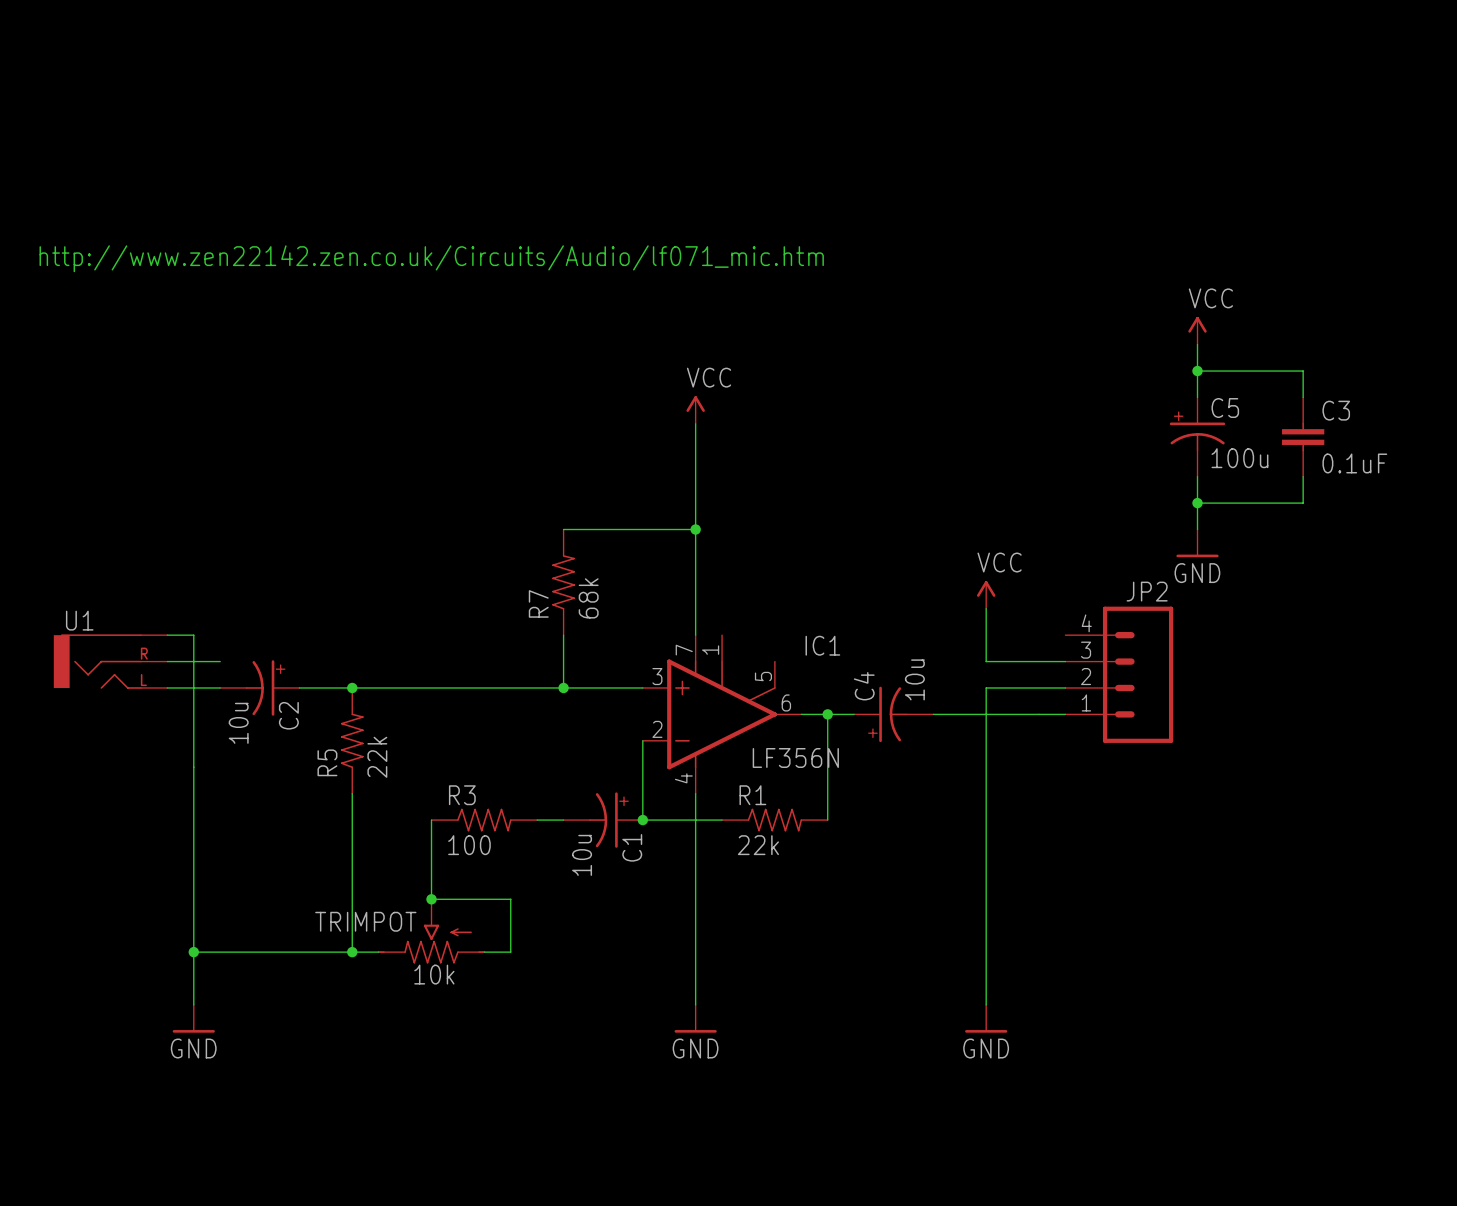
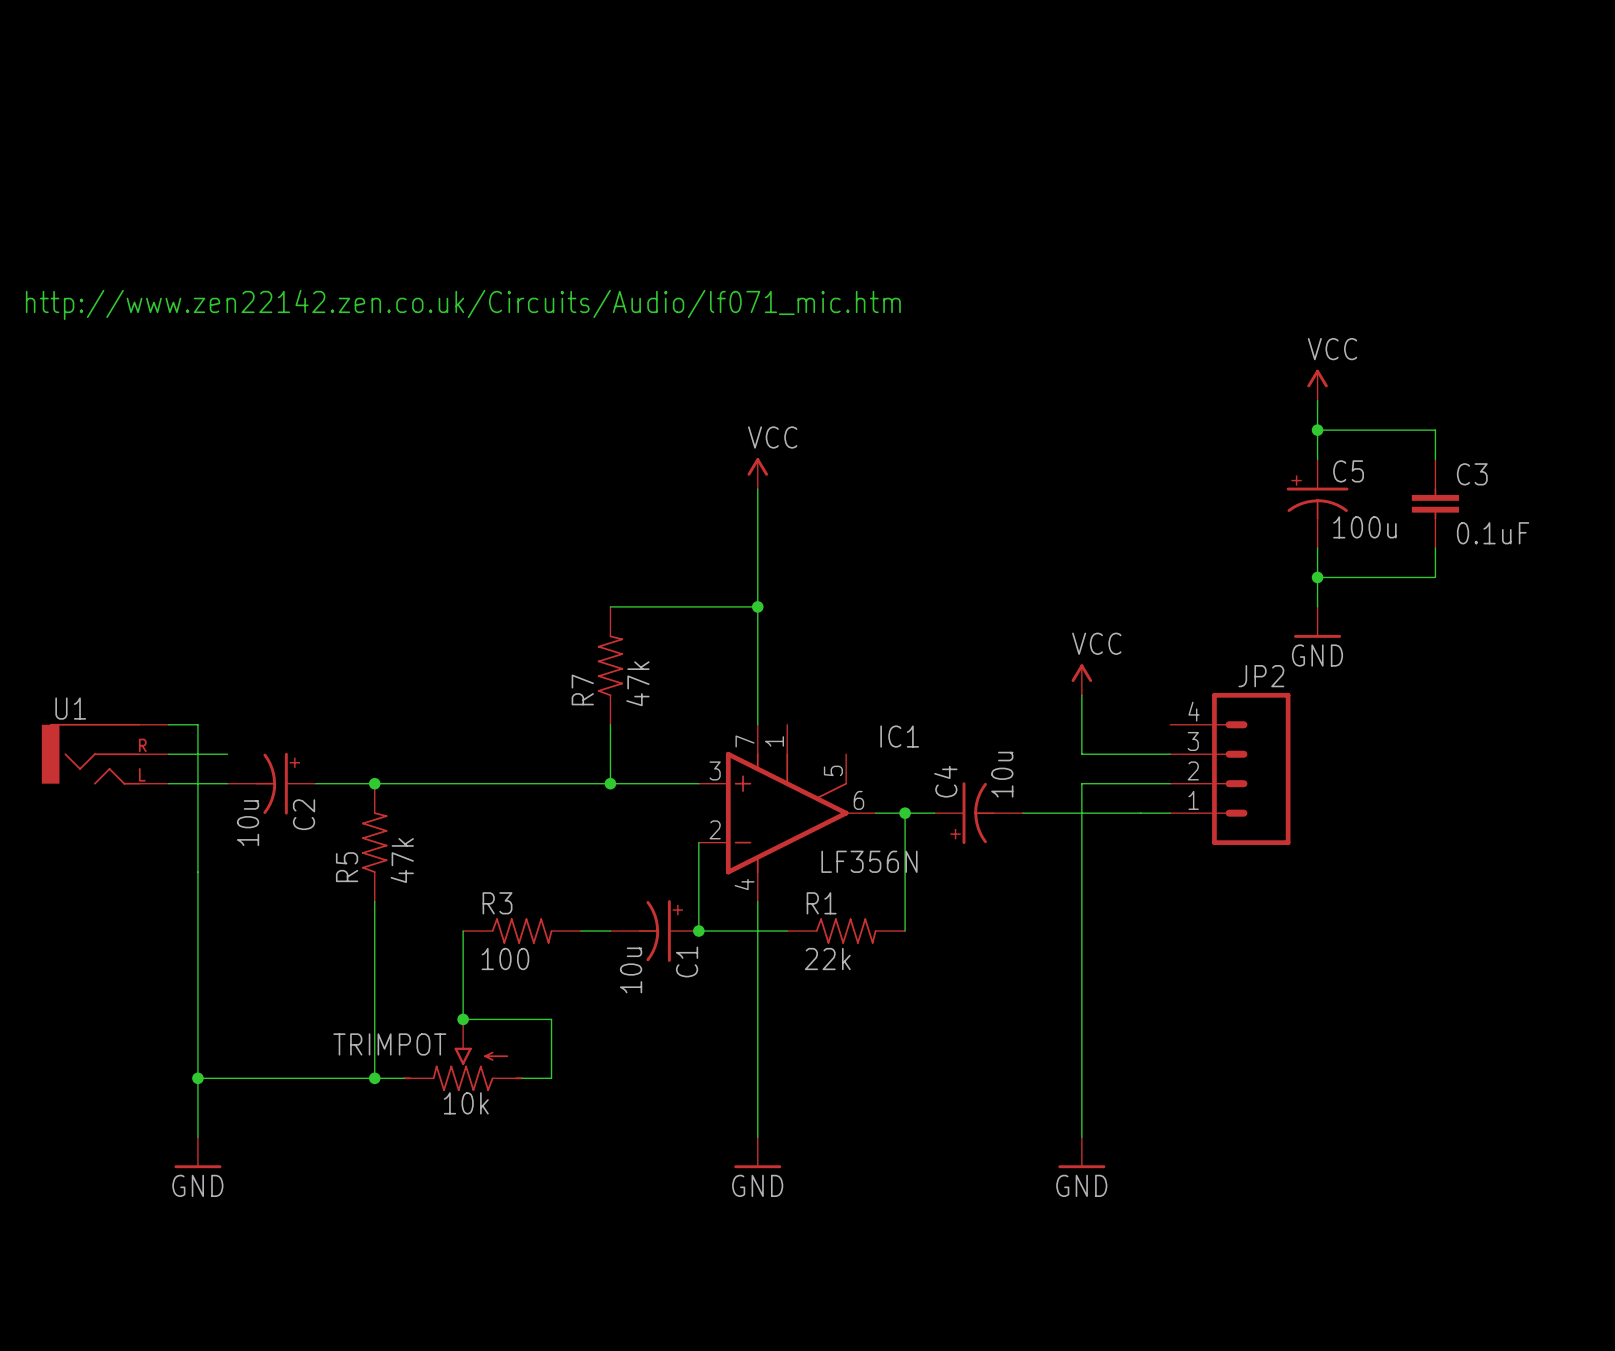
R7 value: 68k (588, 598) -> 47k (637, 683)
R5 value: 22k (377, 757) -> 47k (402, 860)

